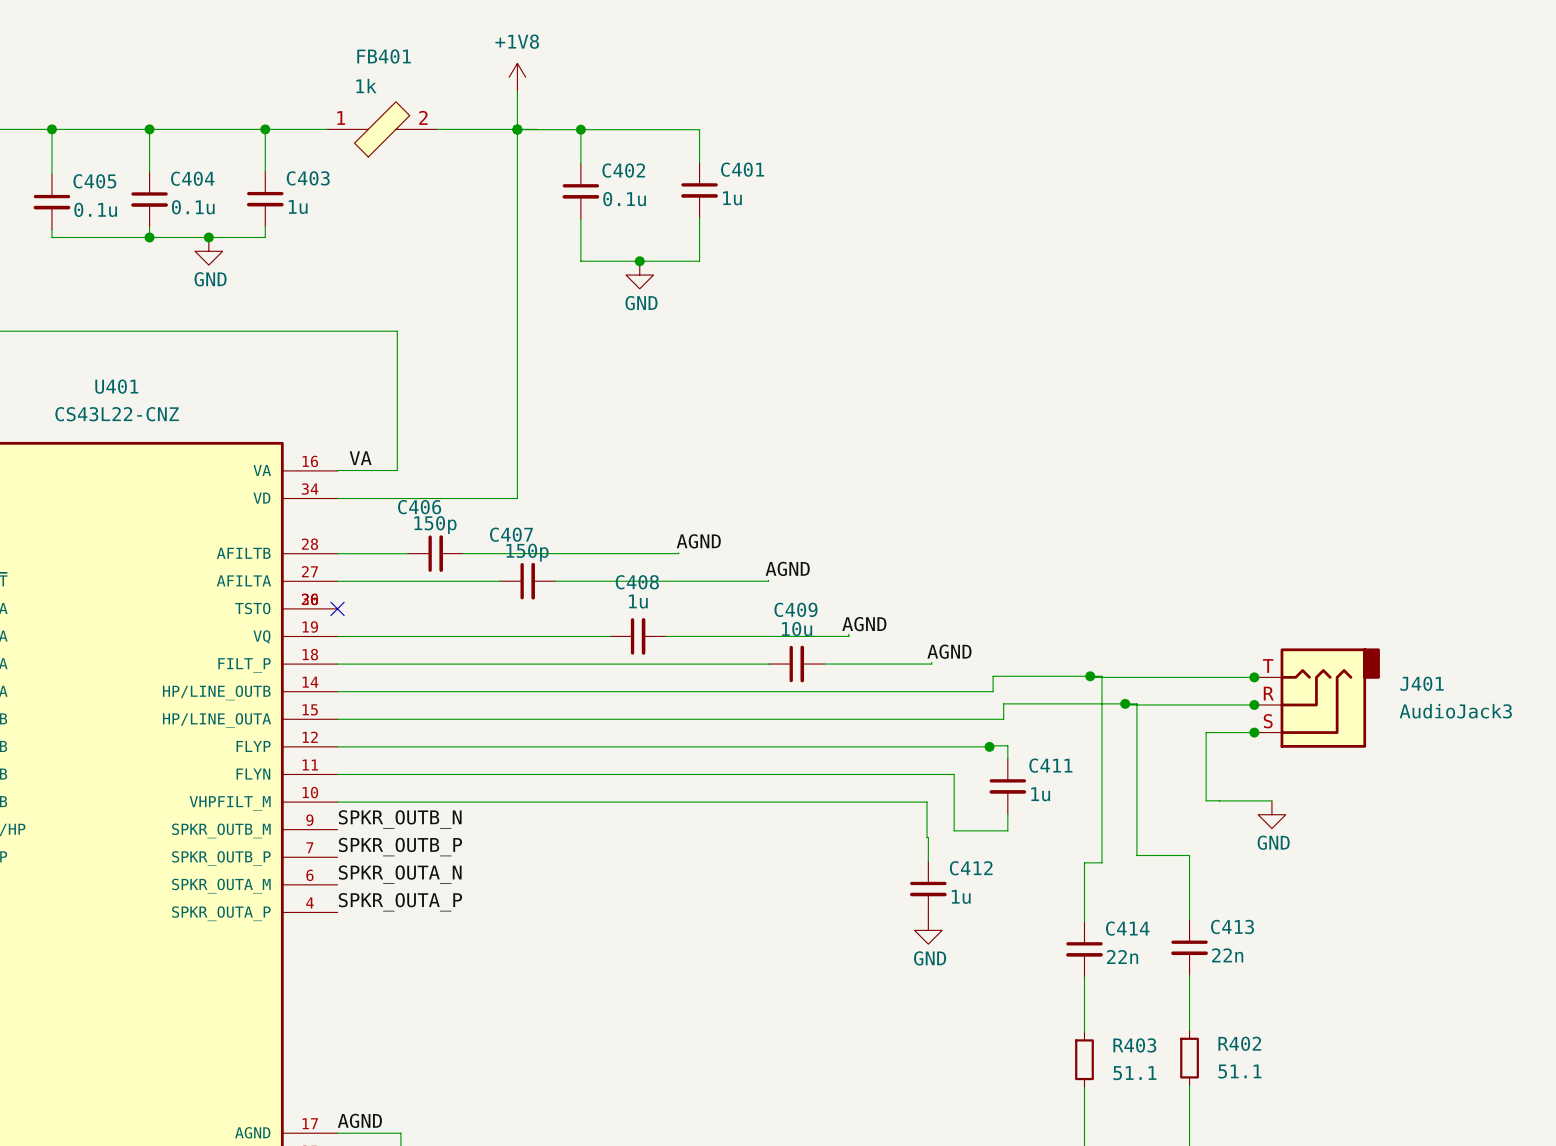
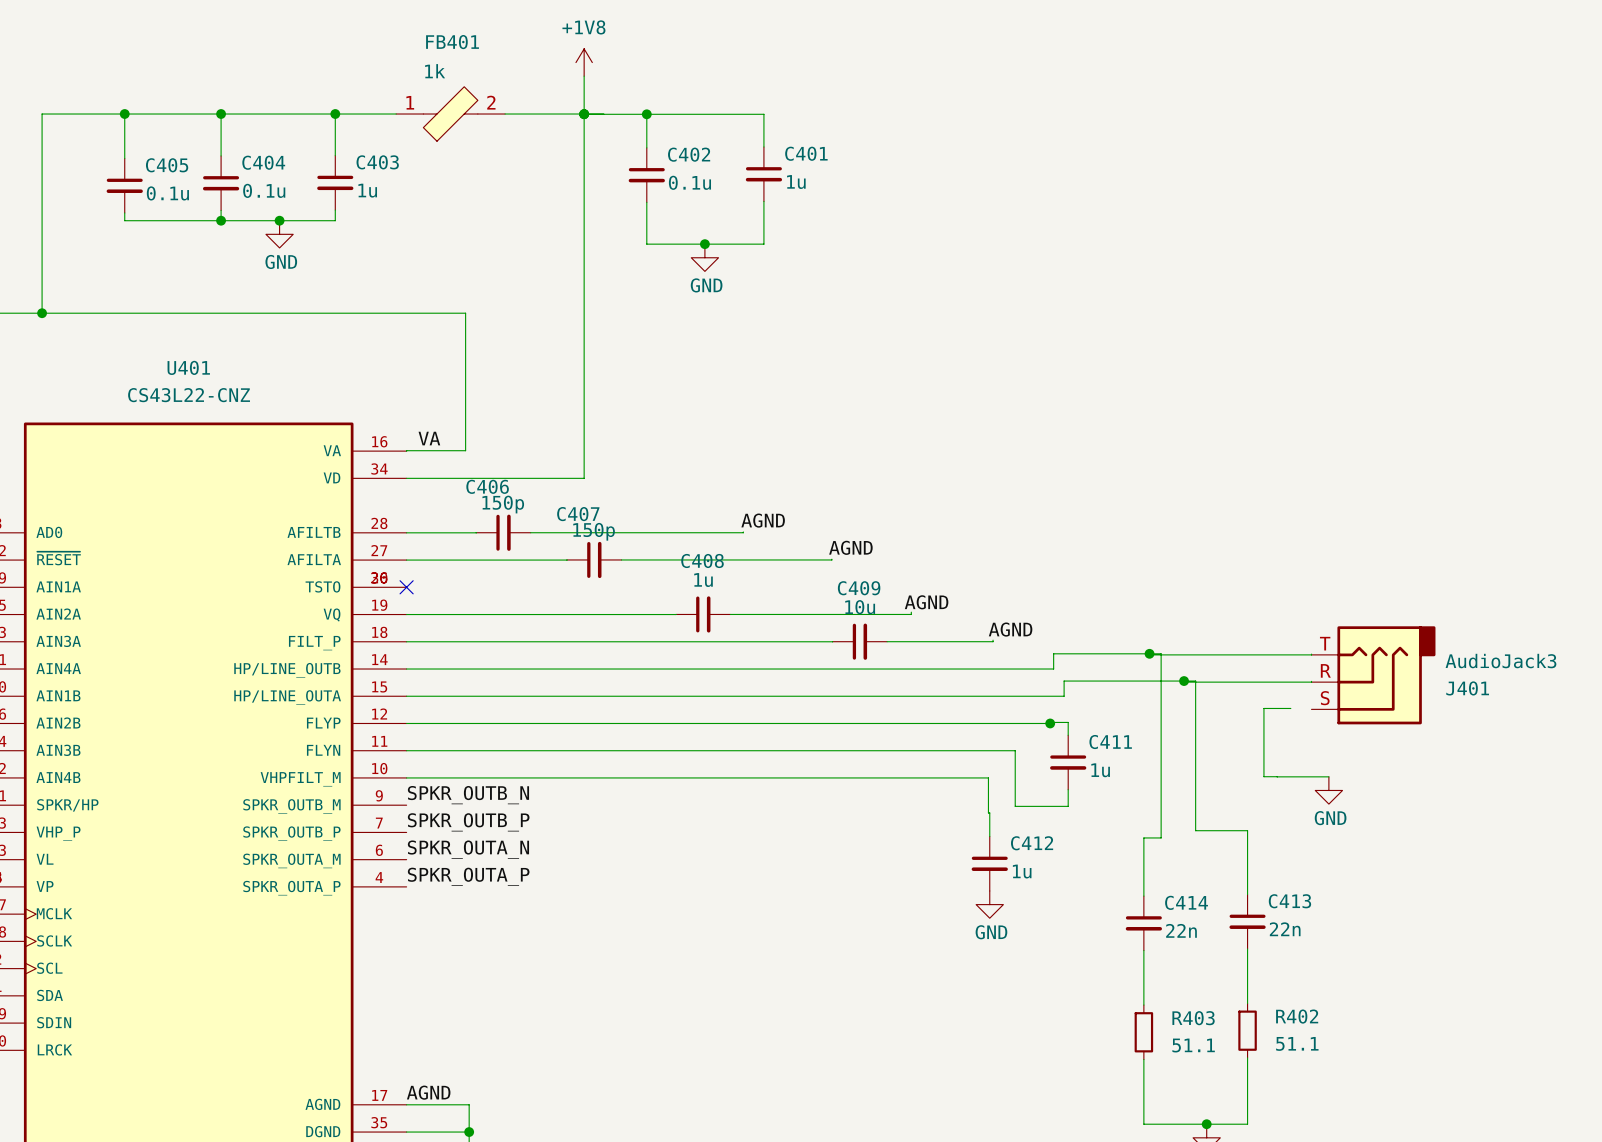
junction: (1254, 677) -> none
J401 name position: J401 (1422, 683) -> J401 (1467, 688)
junction: (1254, 704) -> none
J401 value position: AudioJack3 (1455, 711) -> AudioJack3 (1500, 661)
wire: (1254, 731) (1206, 732) -> (1290, 708) (1263, 709)
junction: (1254, 732) -> none

